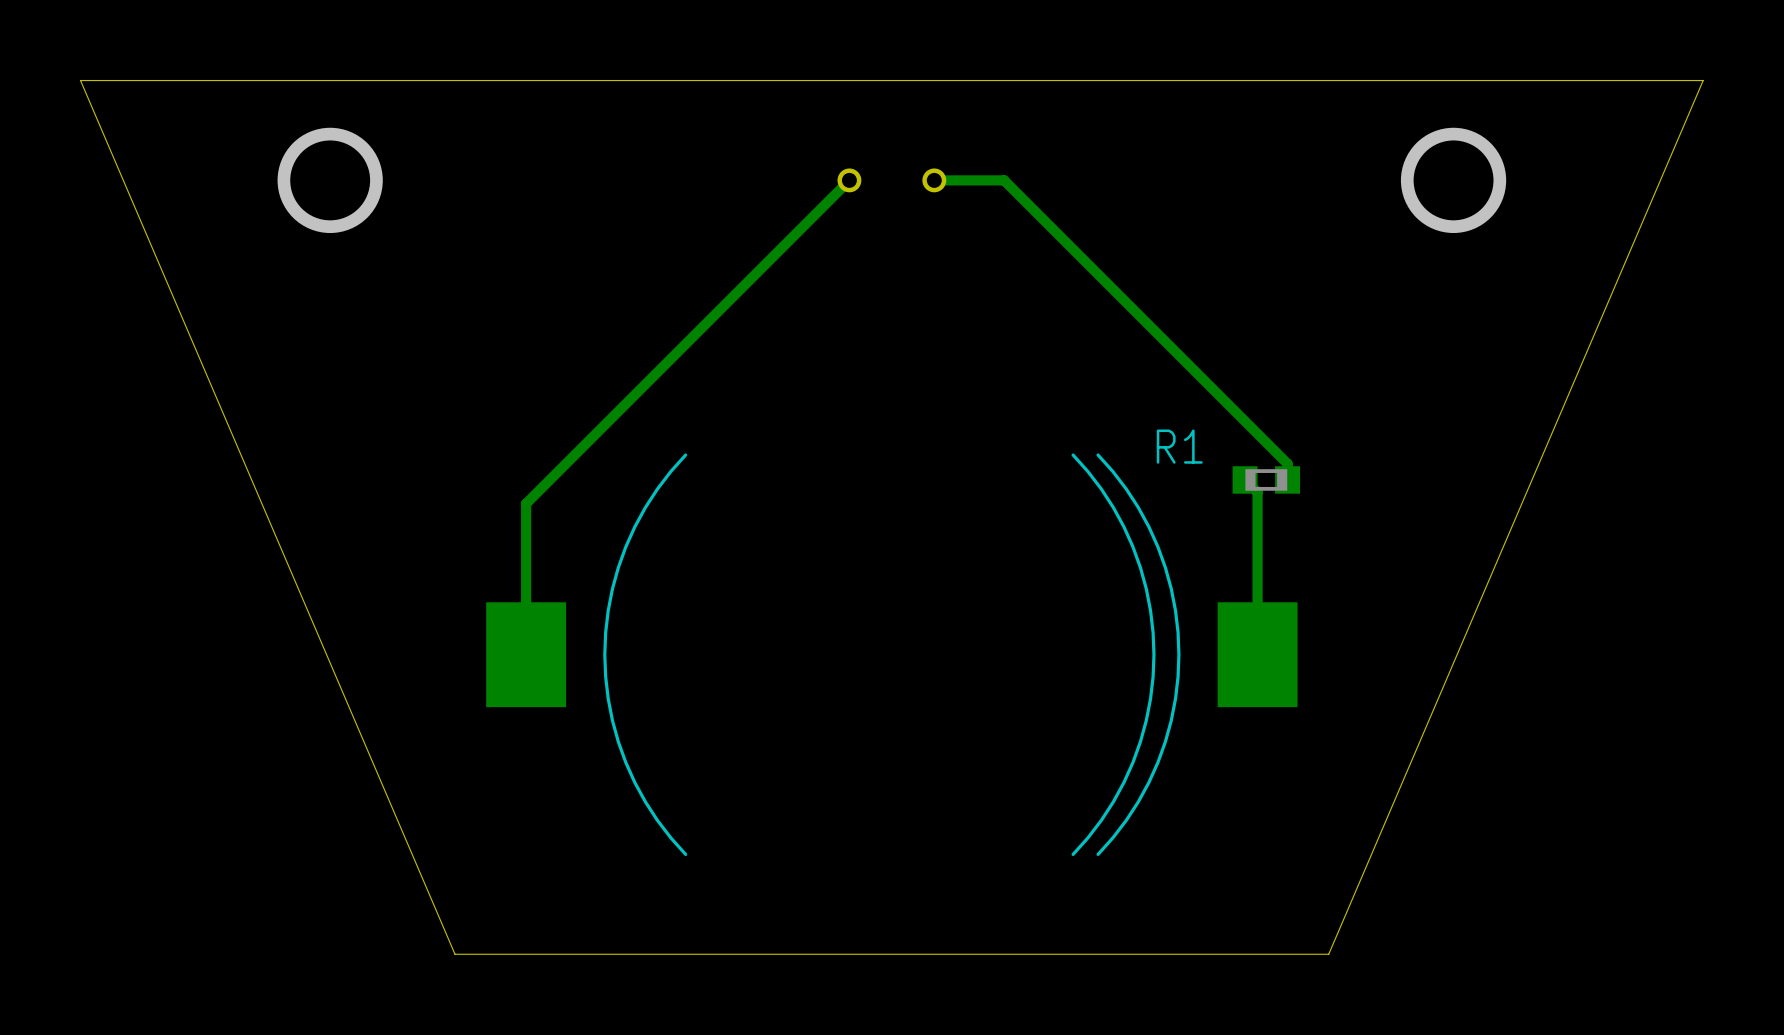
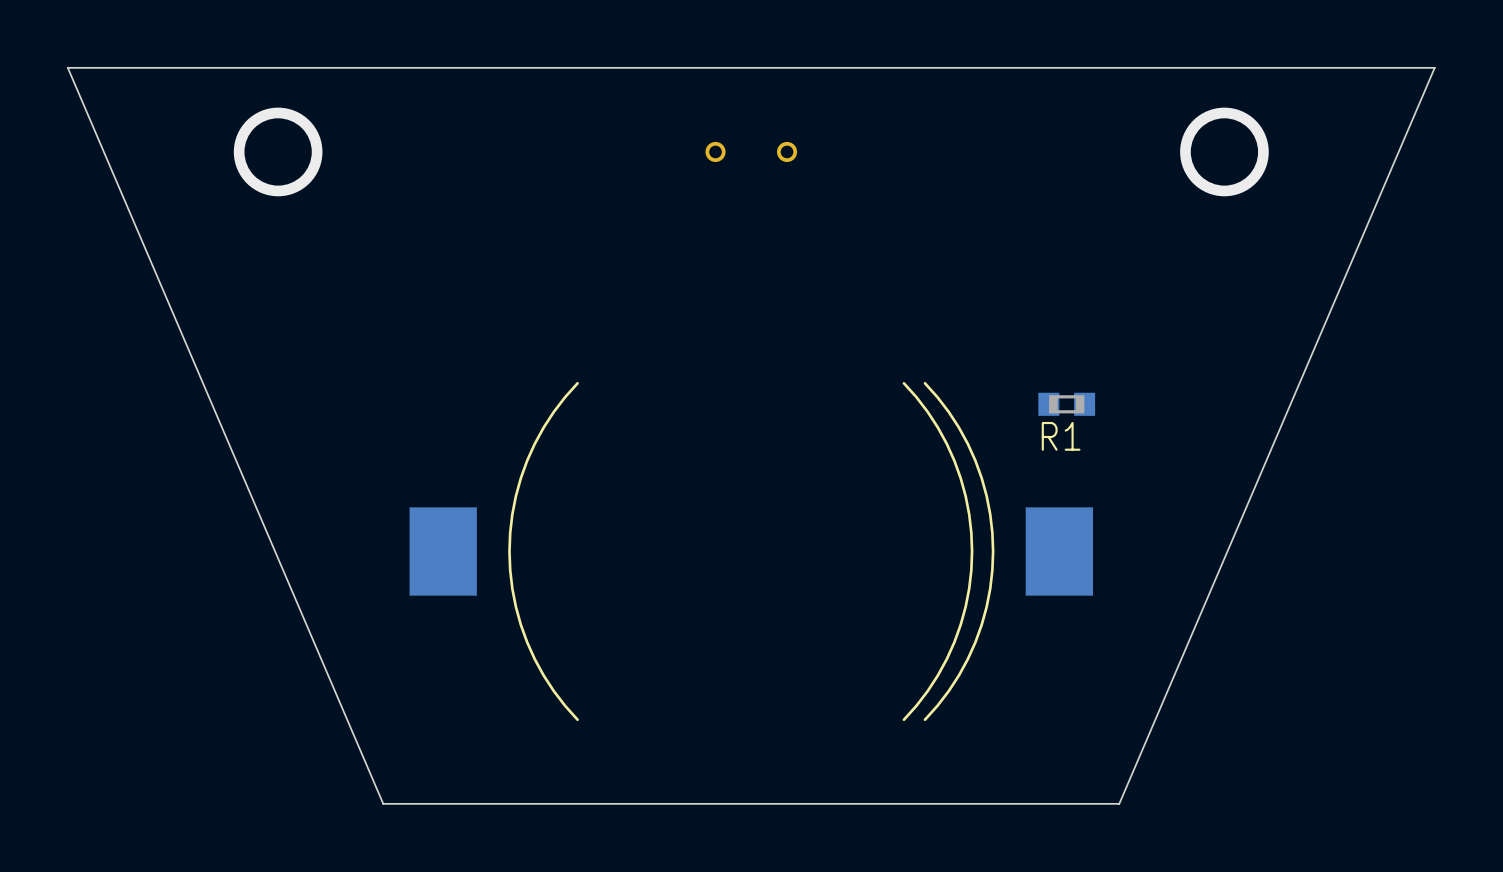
track: (849, 180) (526, 503) (526, 654) -> none
track: (934, 180) (1004, 180) (1287, 463) (1287, 479) -> none
R1 name position: R1 (1179, 446) -> R1 (1061, 436)
track: (1245, 479) (1257, 492) (1257, 654) -> none

